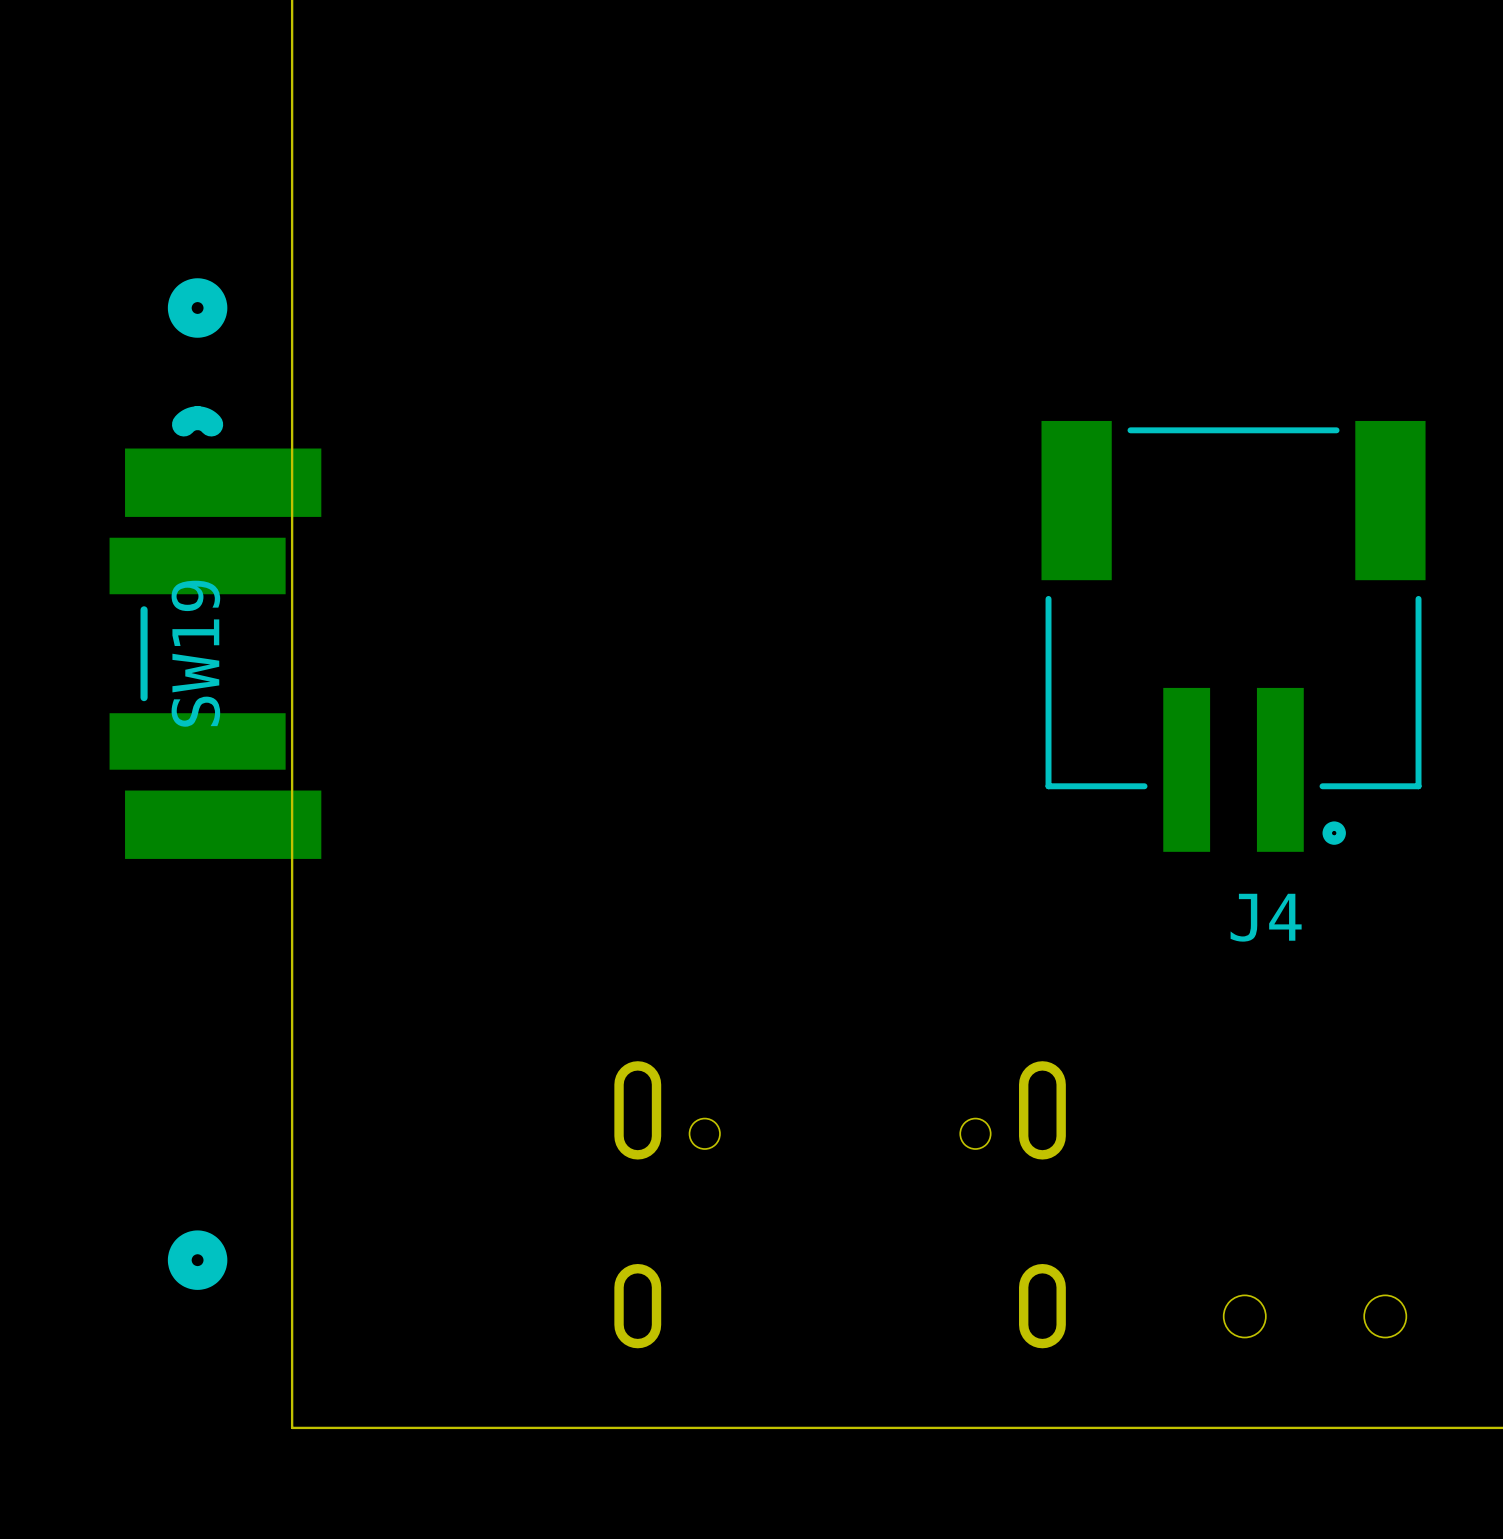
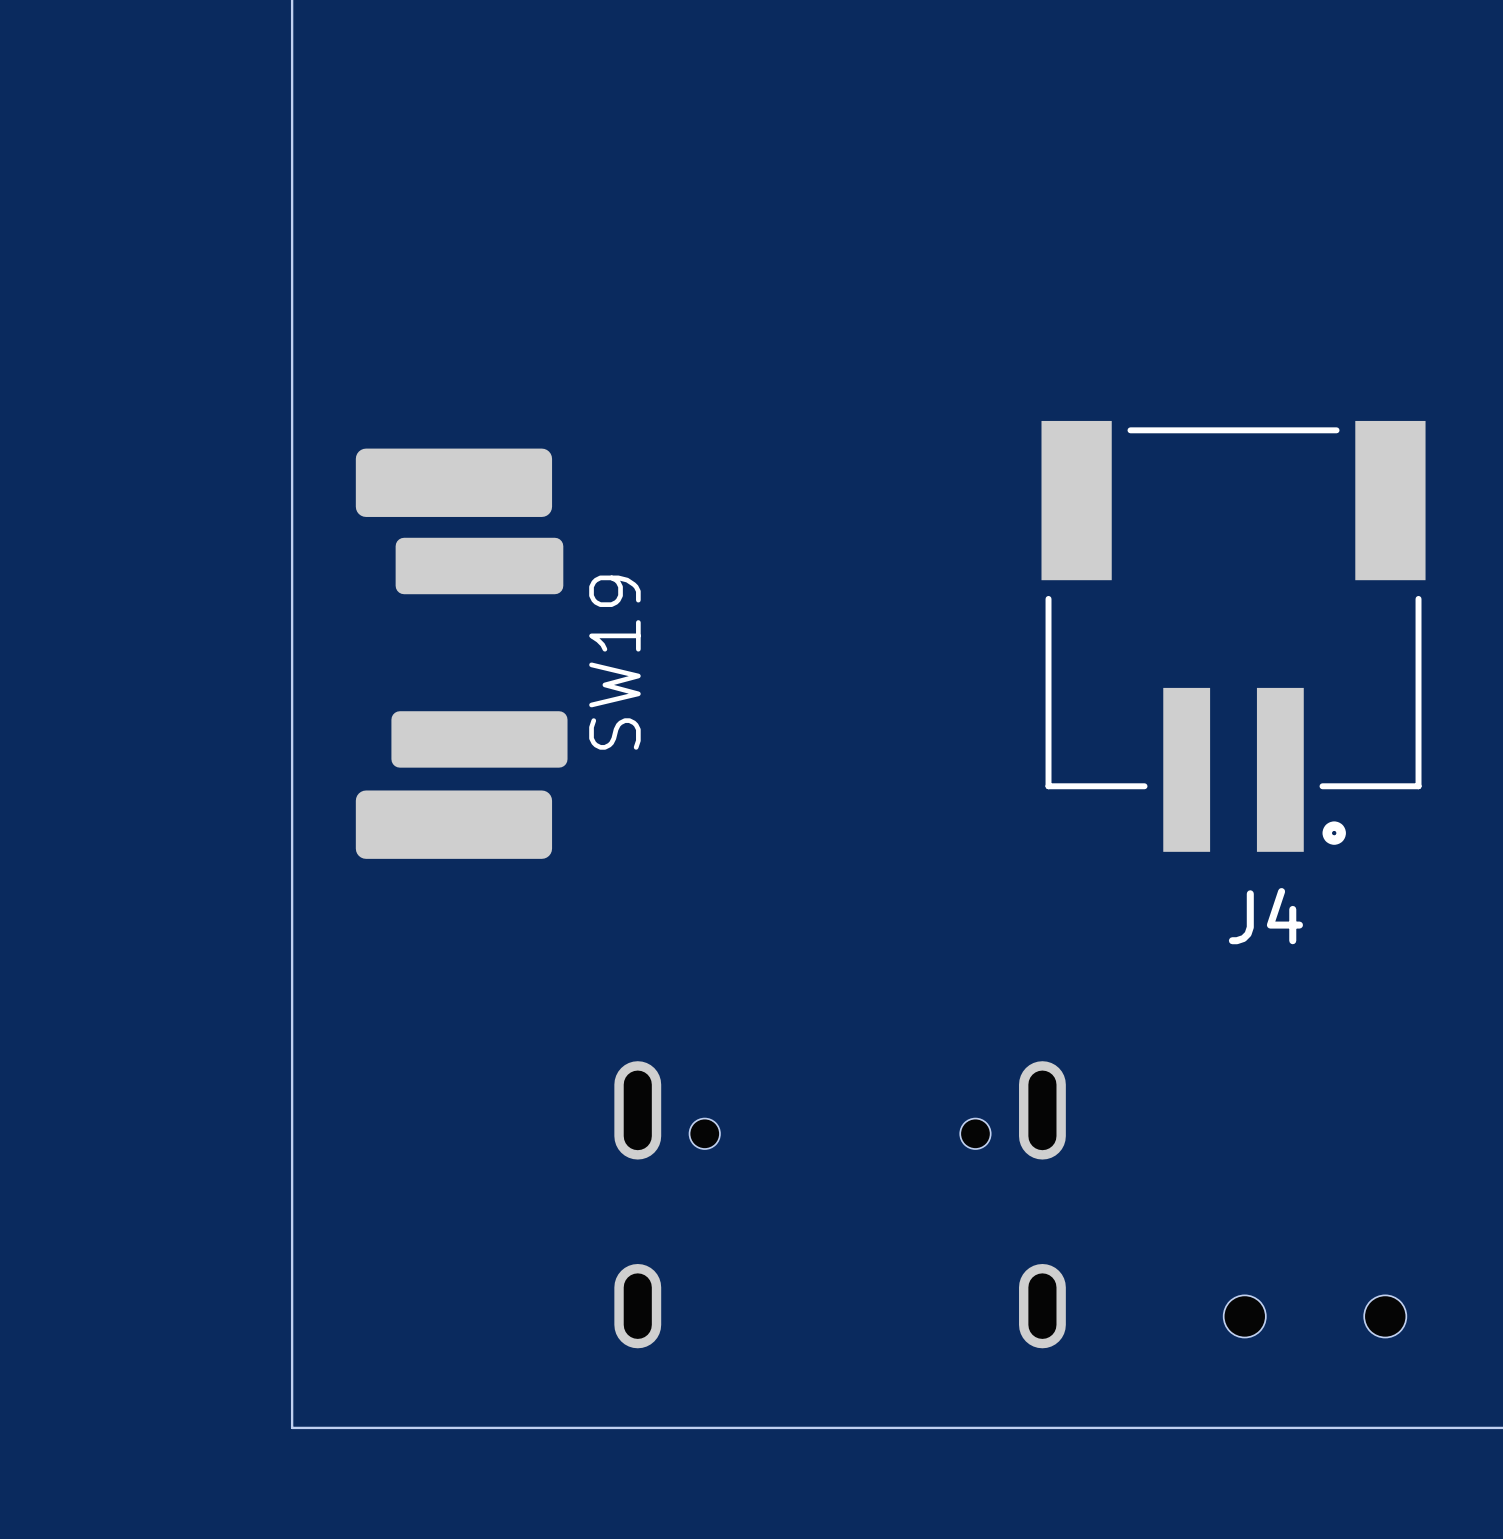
part: (197, 307) -> none
SW19 footprint: [109, 406, 322, 859] -> [355, 448, 568, 859]
SW19 name position: SW19 (195, 653) -> SW19 (614, 662)
part: (197, 1260) -> none

